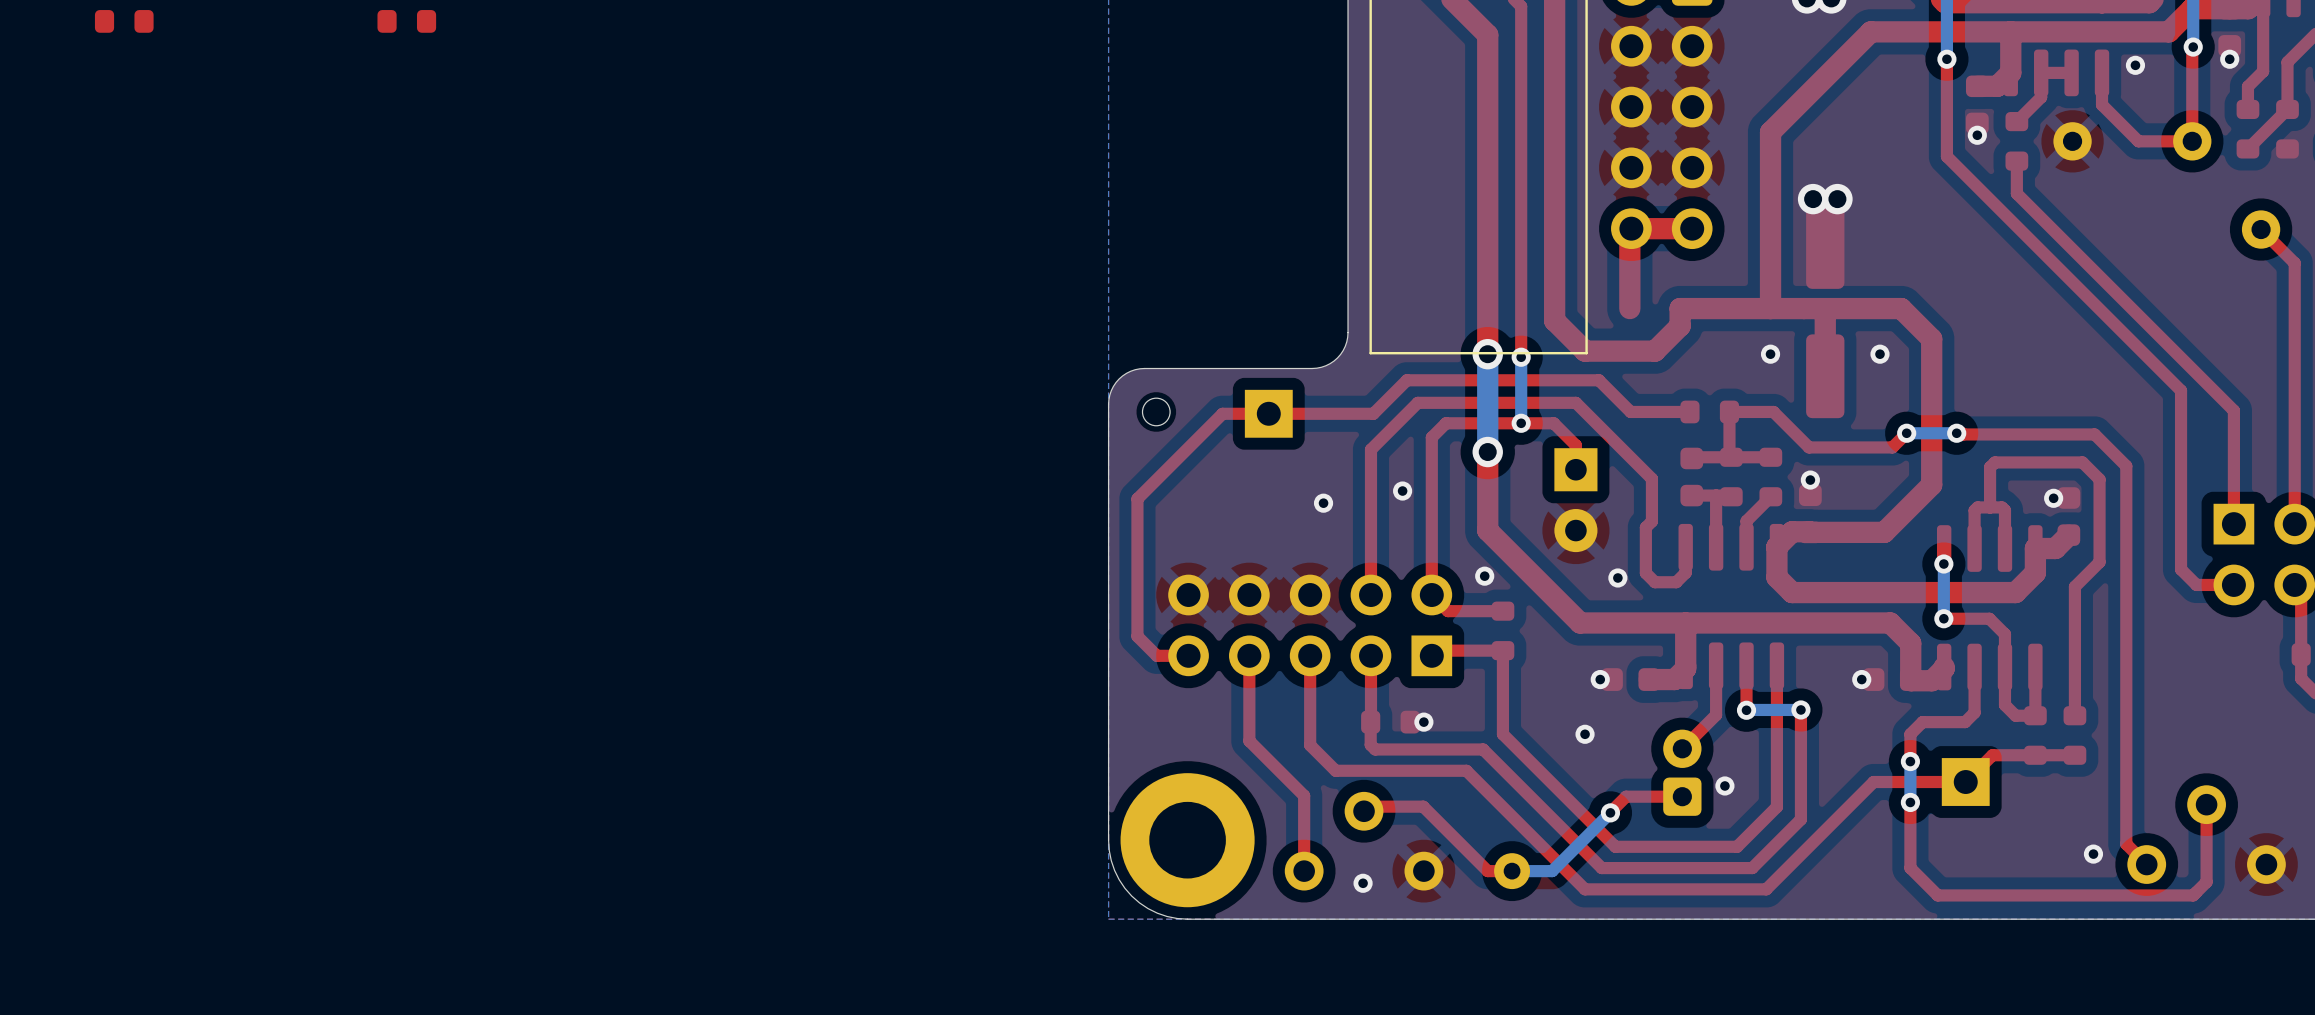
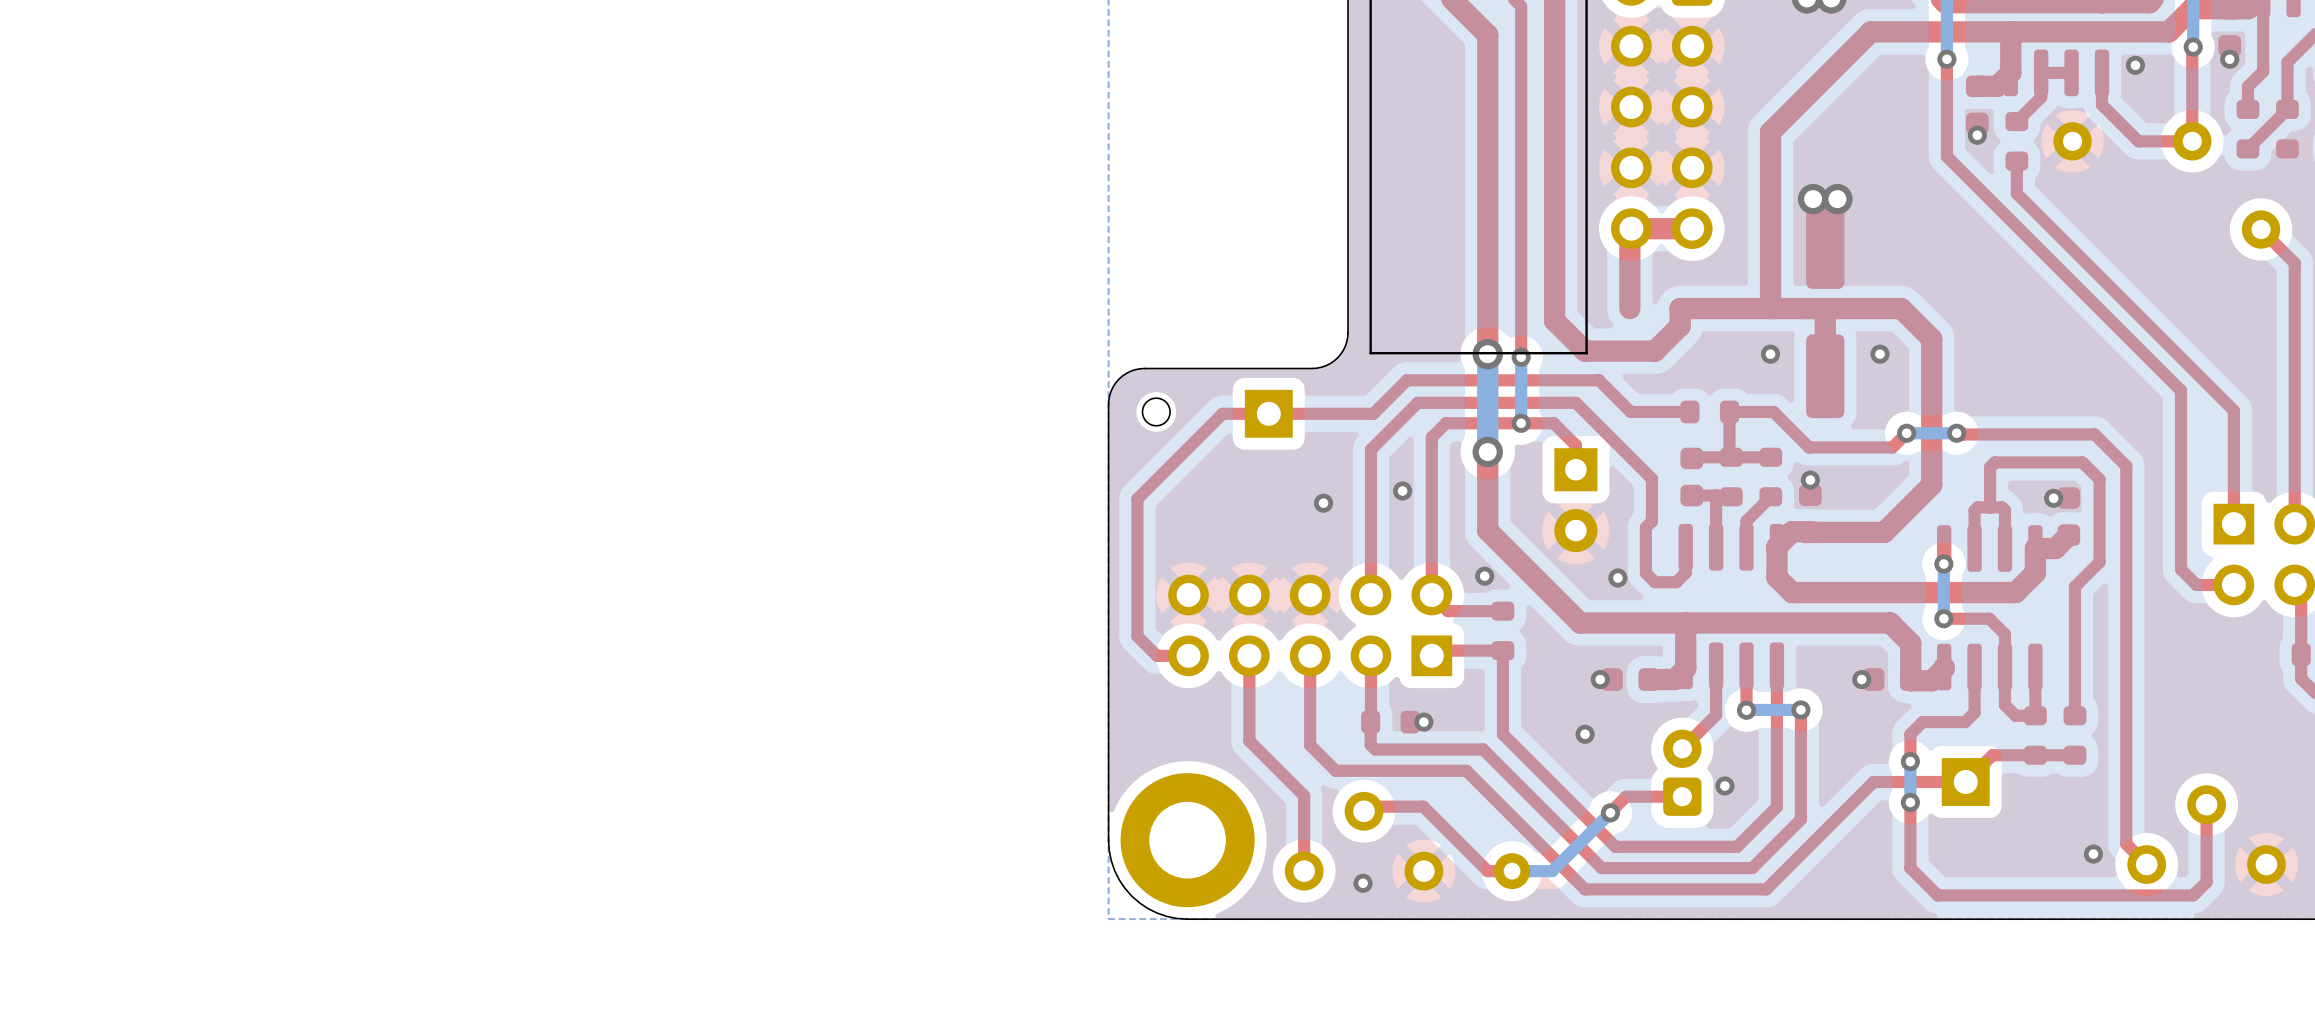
part: (124, 21) -> none
part: (406, 21) -> none

